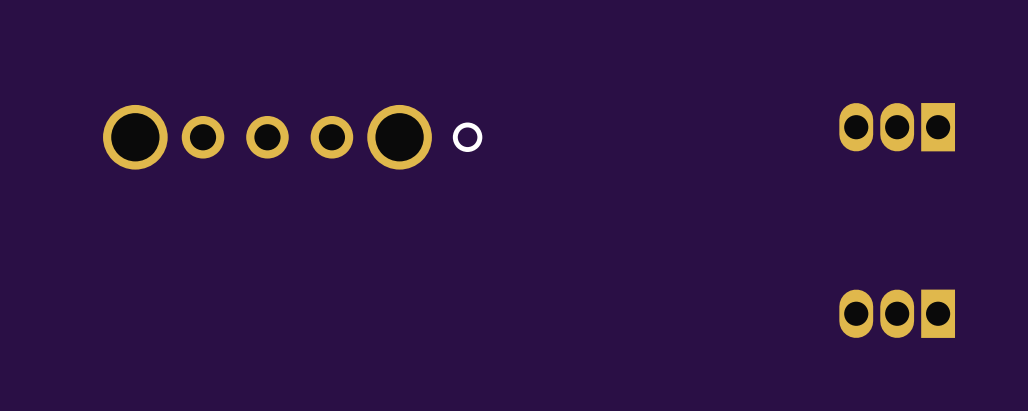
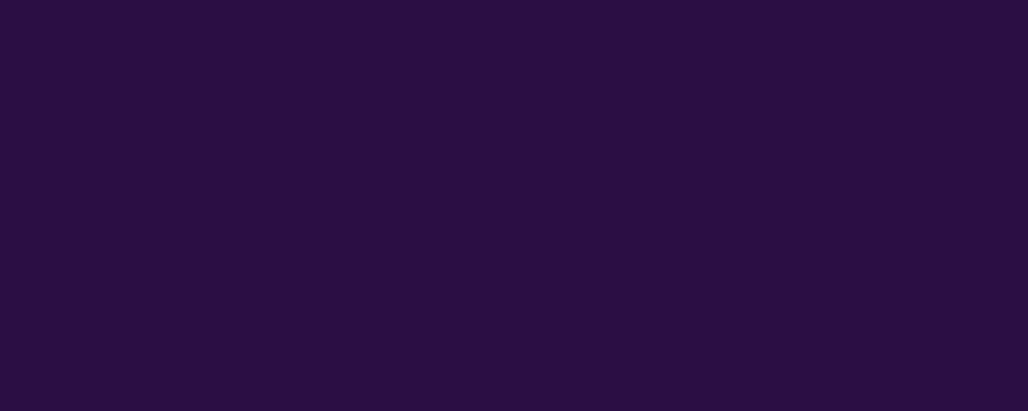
part: (897, 127) -> none
part: (292, 137) -> none
part: (897, 313) -> none

